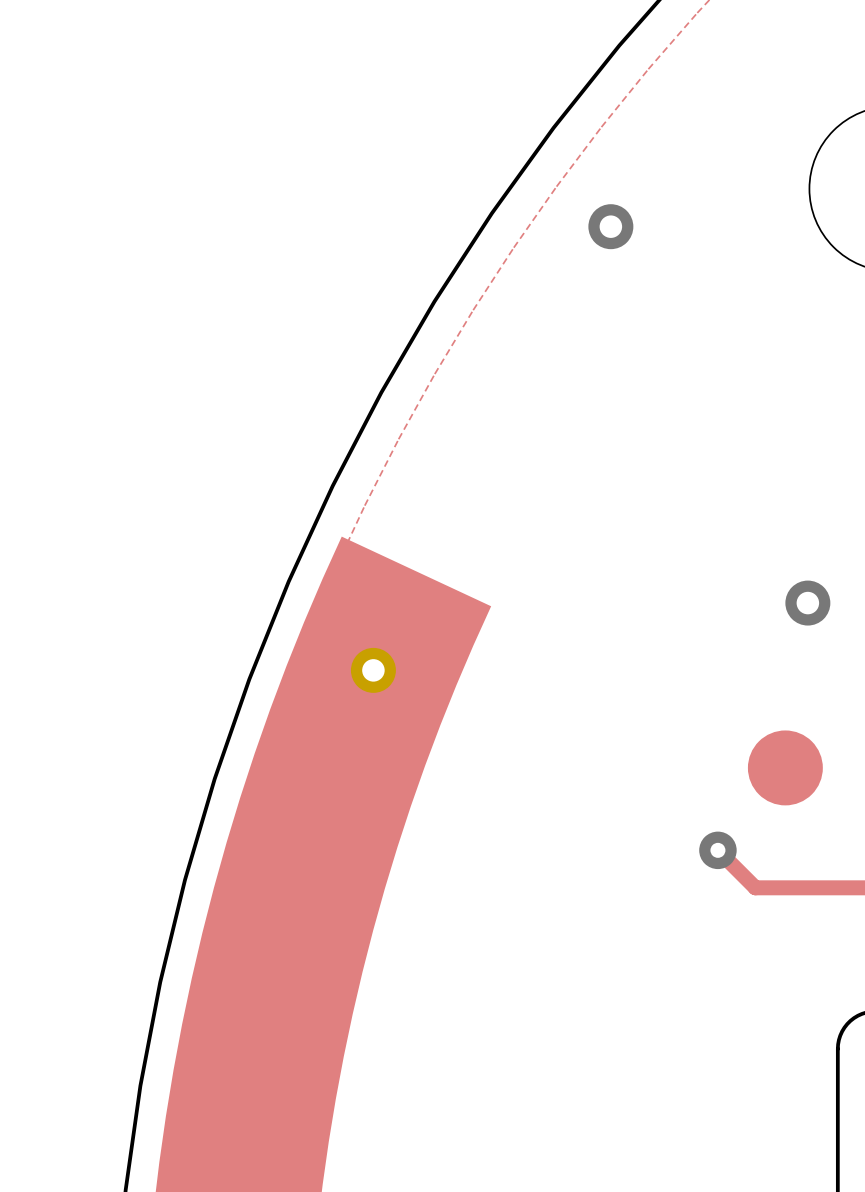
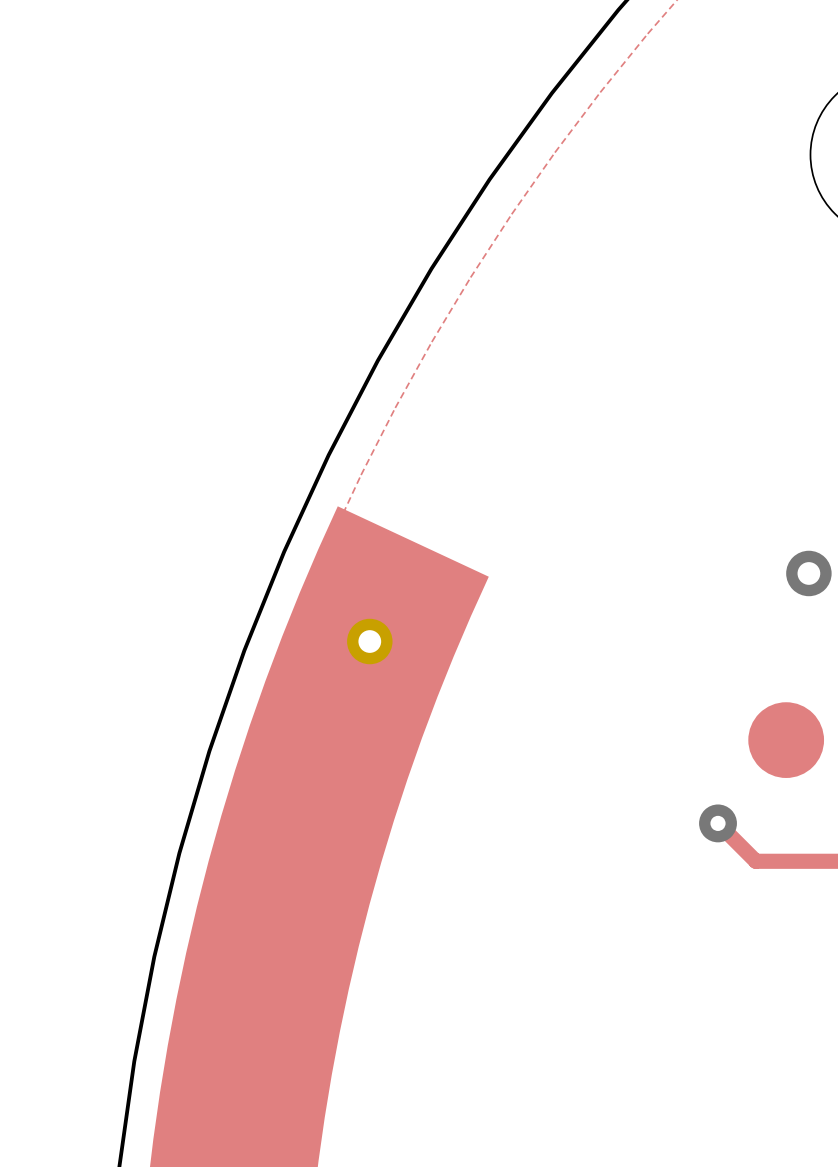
via: (610, 226) -> none

